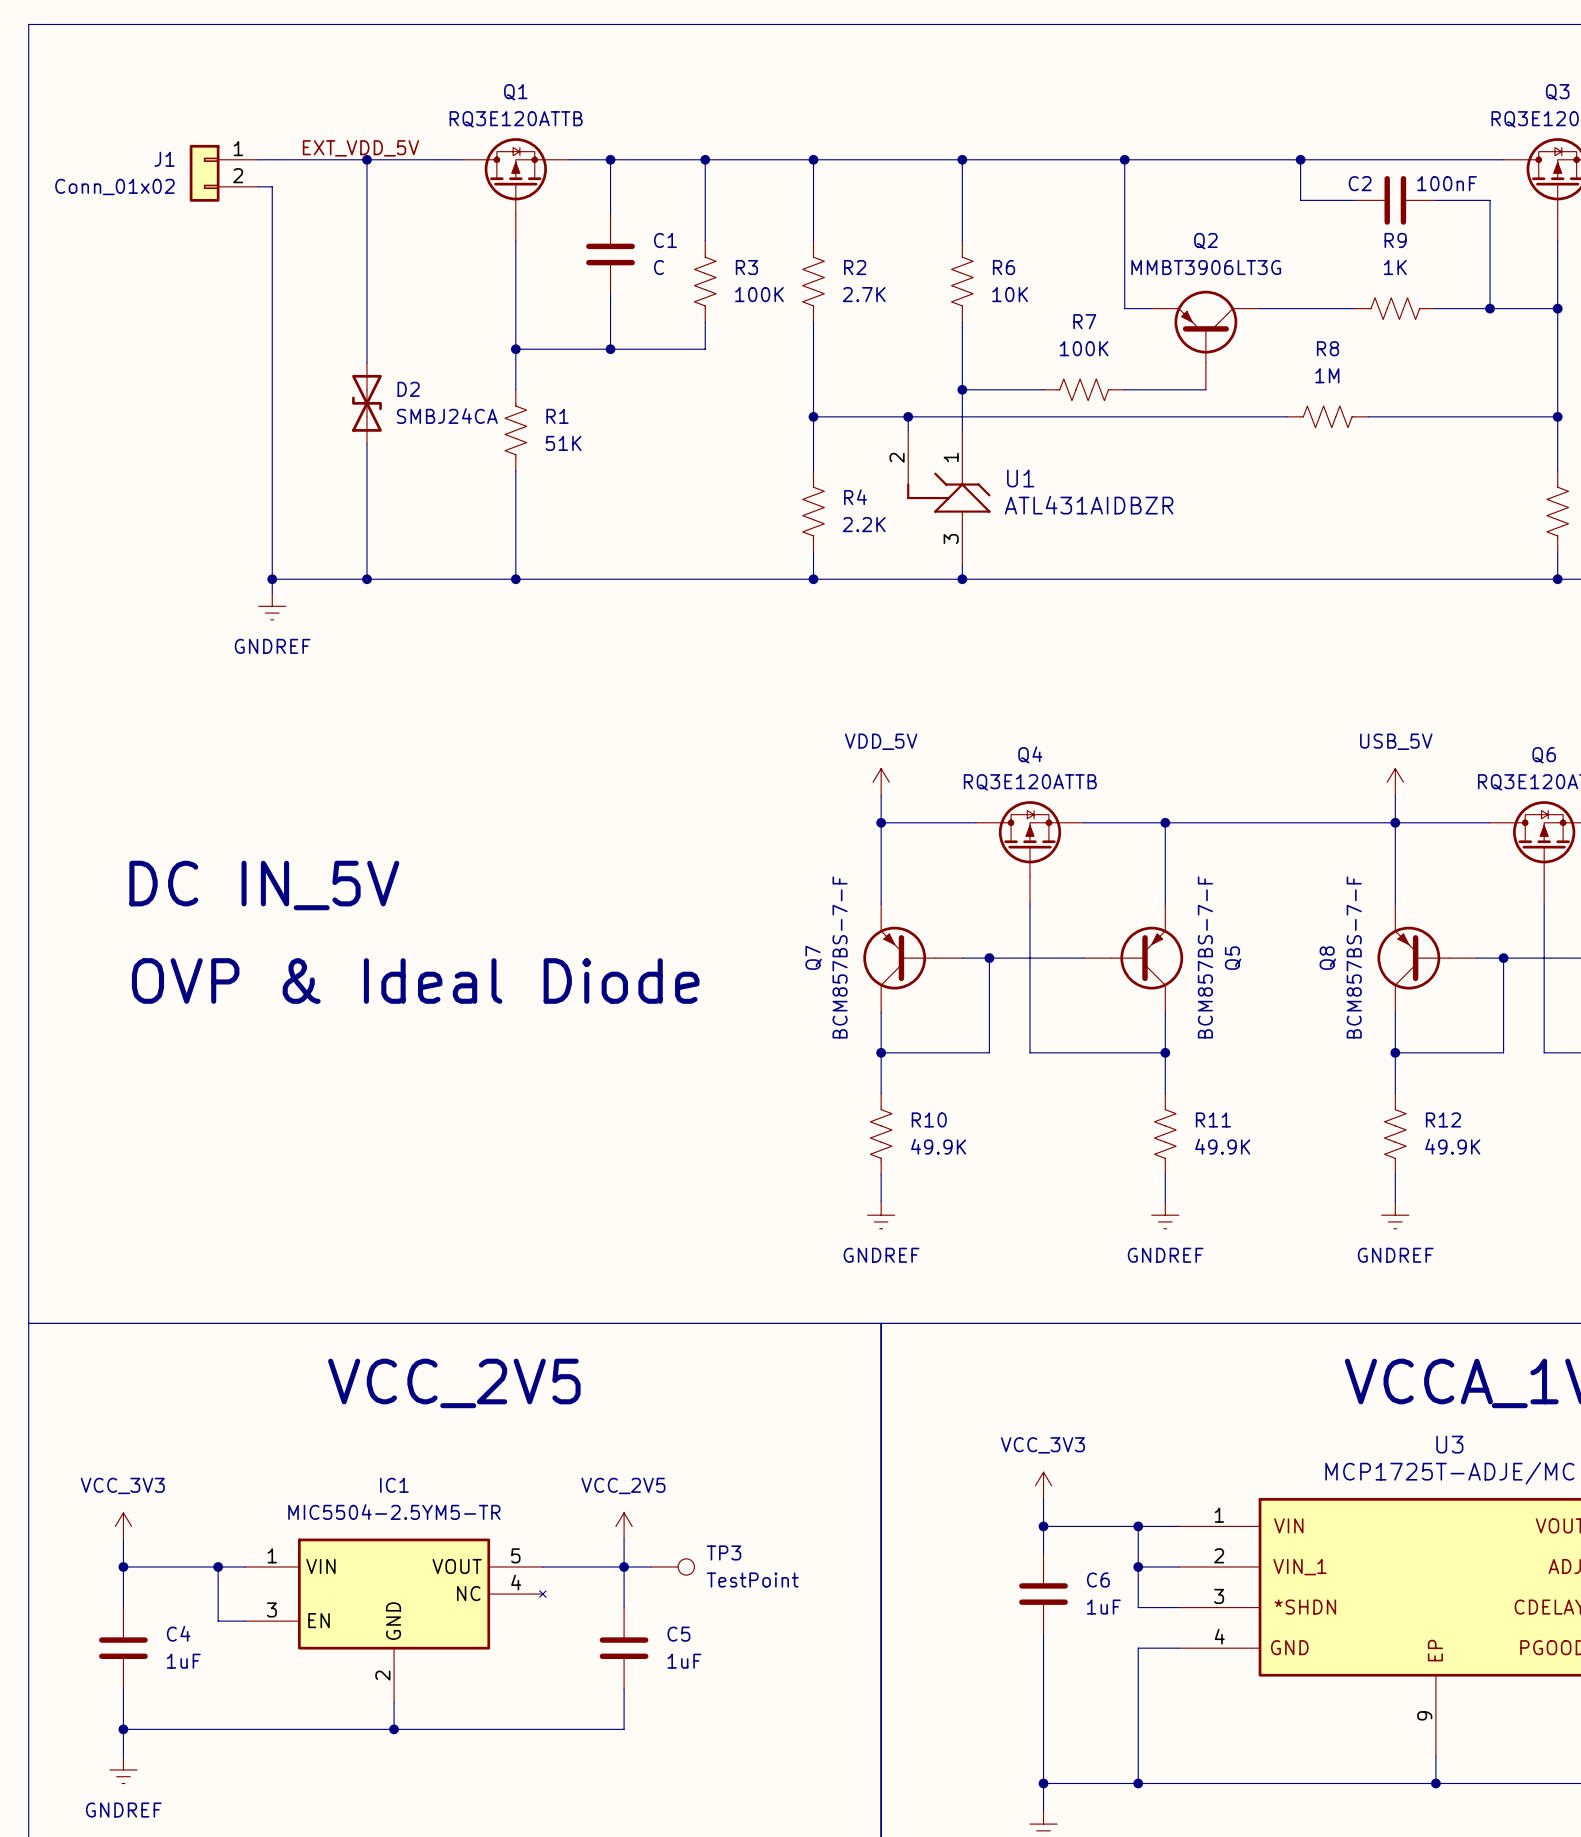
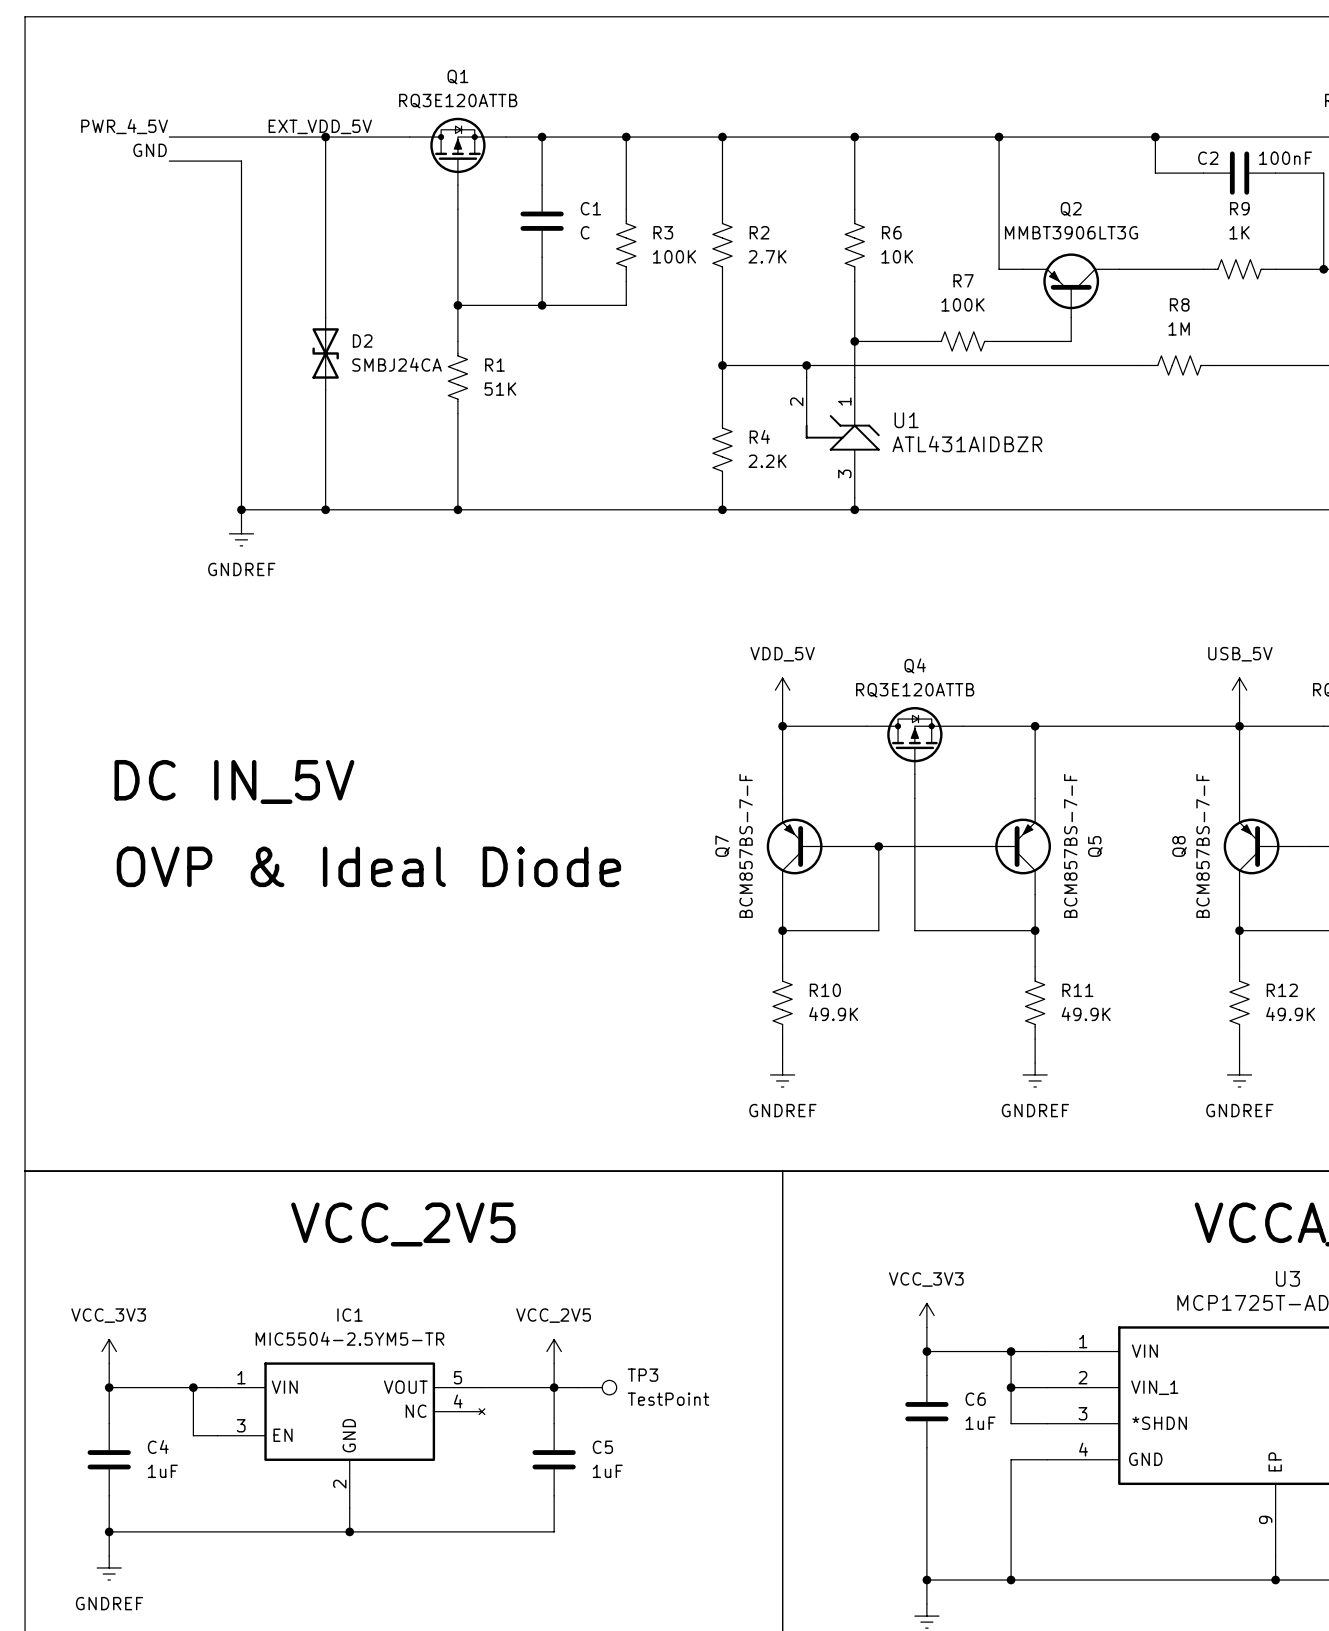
label: none -> PWR_4_5V (124, 126)
J1: Conn_01x02 (224, 173) -> none
label: none -> GND (150, 150)

